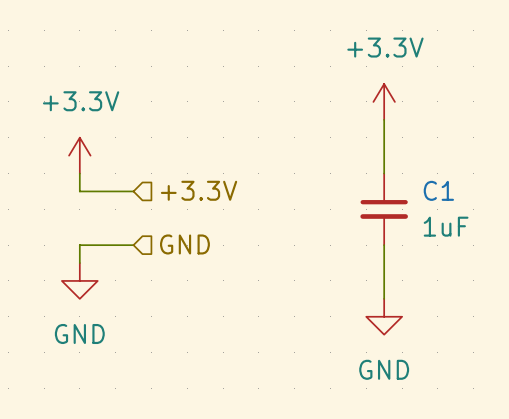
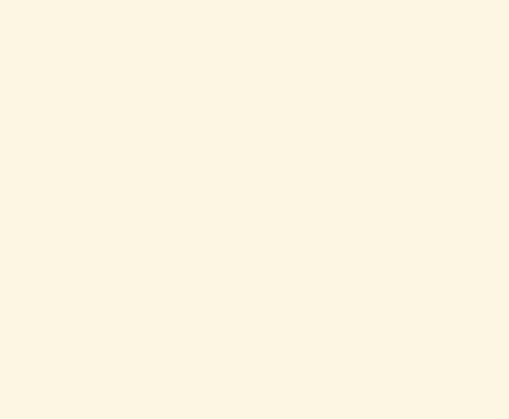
power symbol: +3.3V (384, 101) -> none
wire: (384, 119) (384, 173) -> none
power symbol: +3.3V (79, 155) -> none
wire: (79, 173) (79, 191) (133, 191) -> none
hierarchical label: +3.3V (199, 190) -> none
C1: 1uF (384, 209) -> none
hierarchical label: GND (184, 244) -> none
wire: (133, 245) (79, 245) (79, 263) -> none
wire: (384, 245) (384, 298) -> none
power symbol: GND (79, 280) -> none
power symbol: GND (384, 316) -> none

